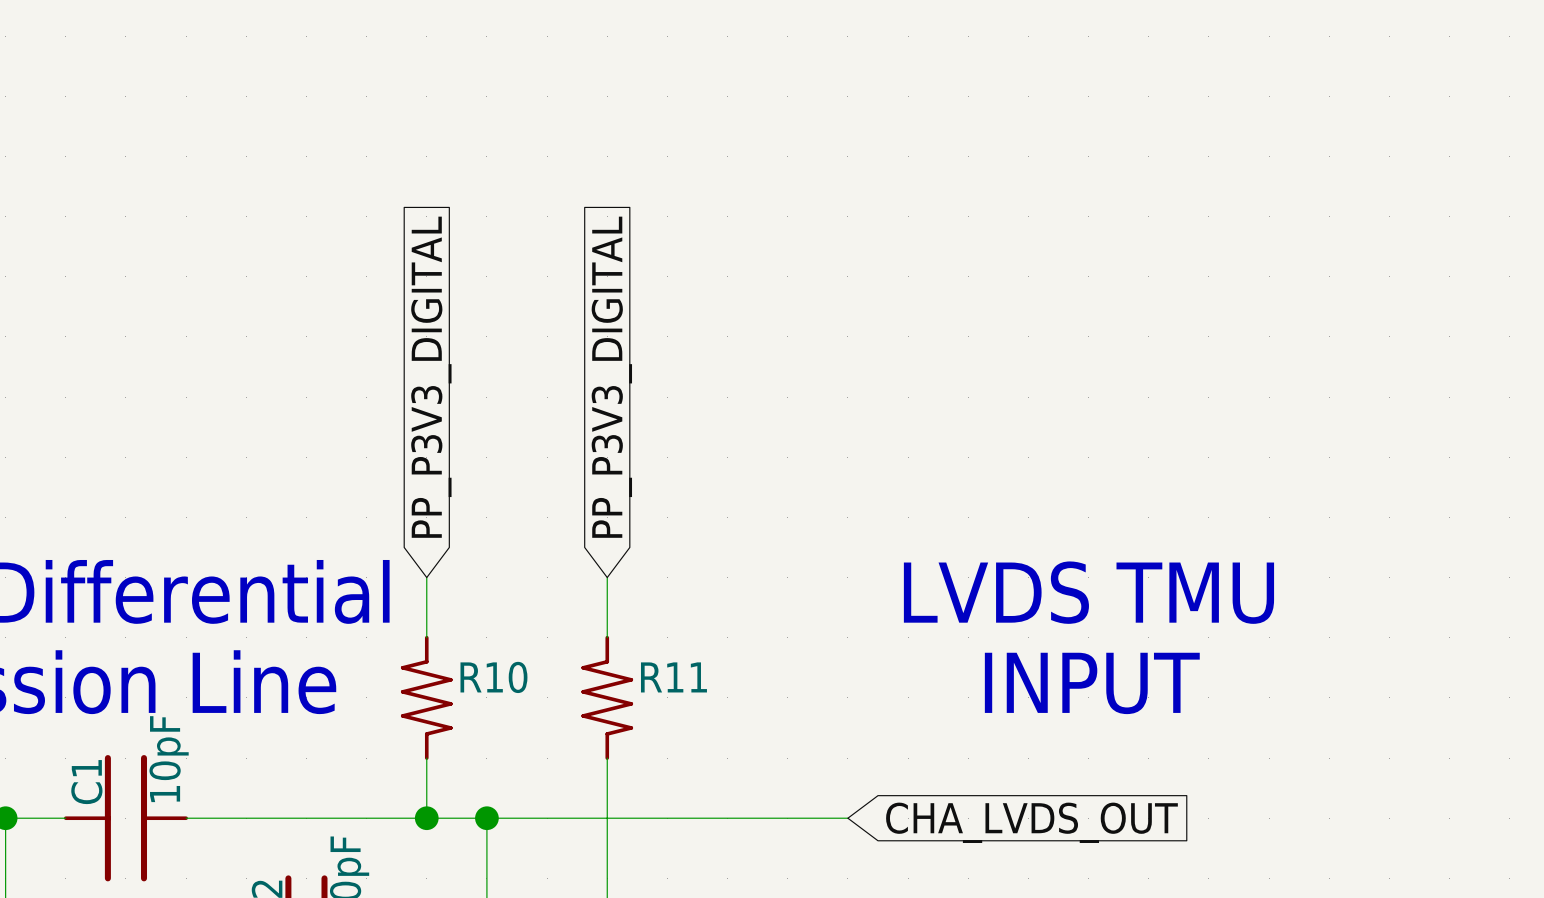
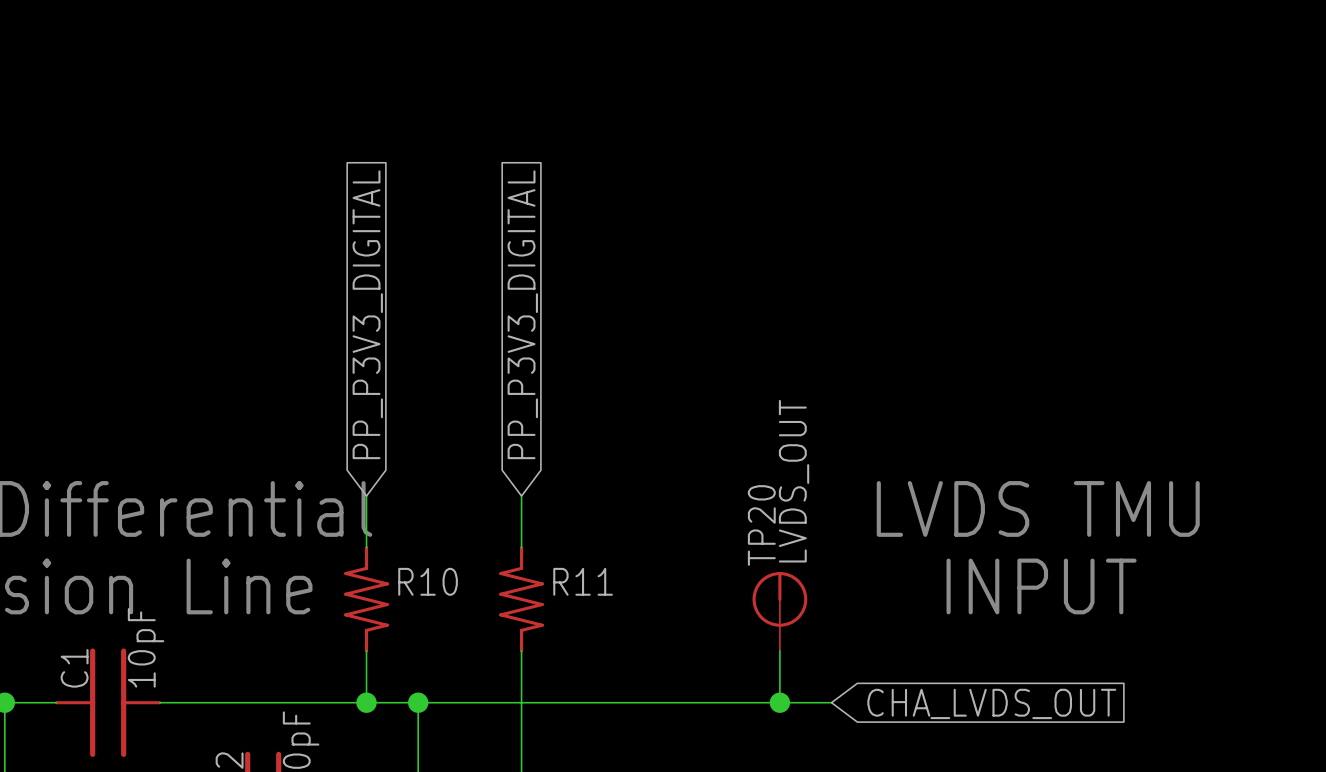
text position: LVDS TMU (1088, 592) -> LVDS TMU (1038, 508)
text position: INPUT (1092, 683) -> INPUT (1041, 586)
TP20: none -> LVDS_OUT (779, 611)
wire: none -> (779, 651) (779, 702)
wire: none -> (728, 702) (831, 702)
junction: none -> (779, 702)
global label position: CHA_LVDS_OUT (1031, 822) -> CHA_LVDS_OUT (991, 703)

